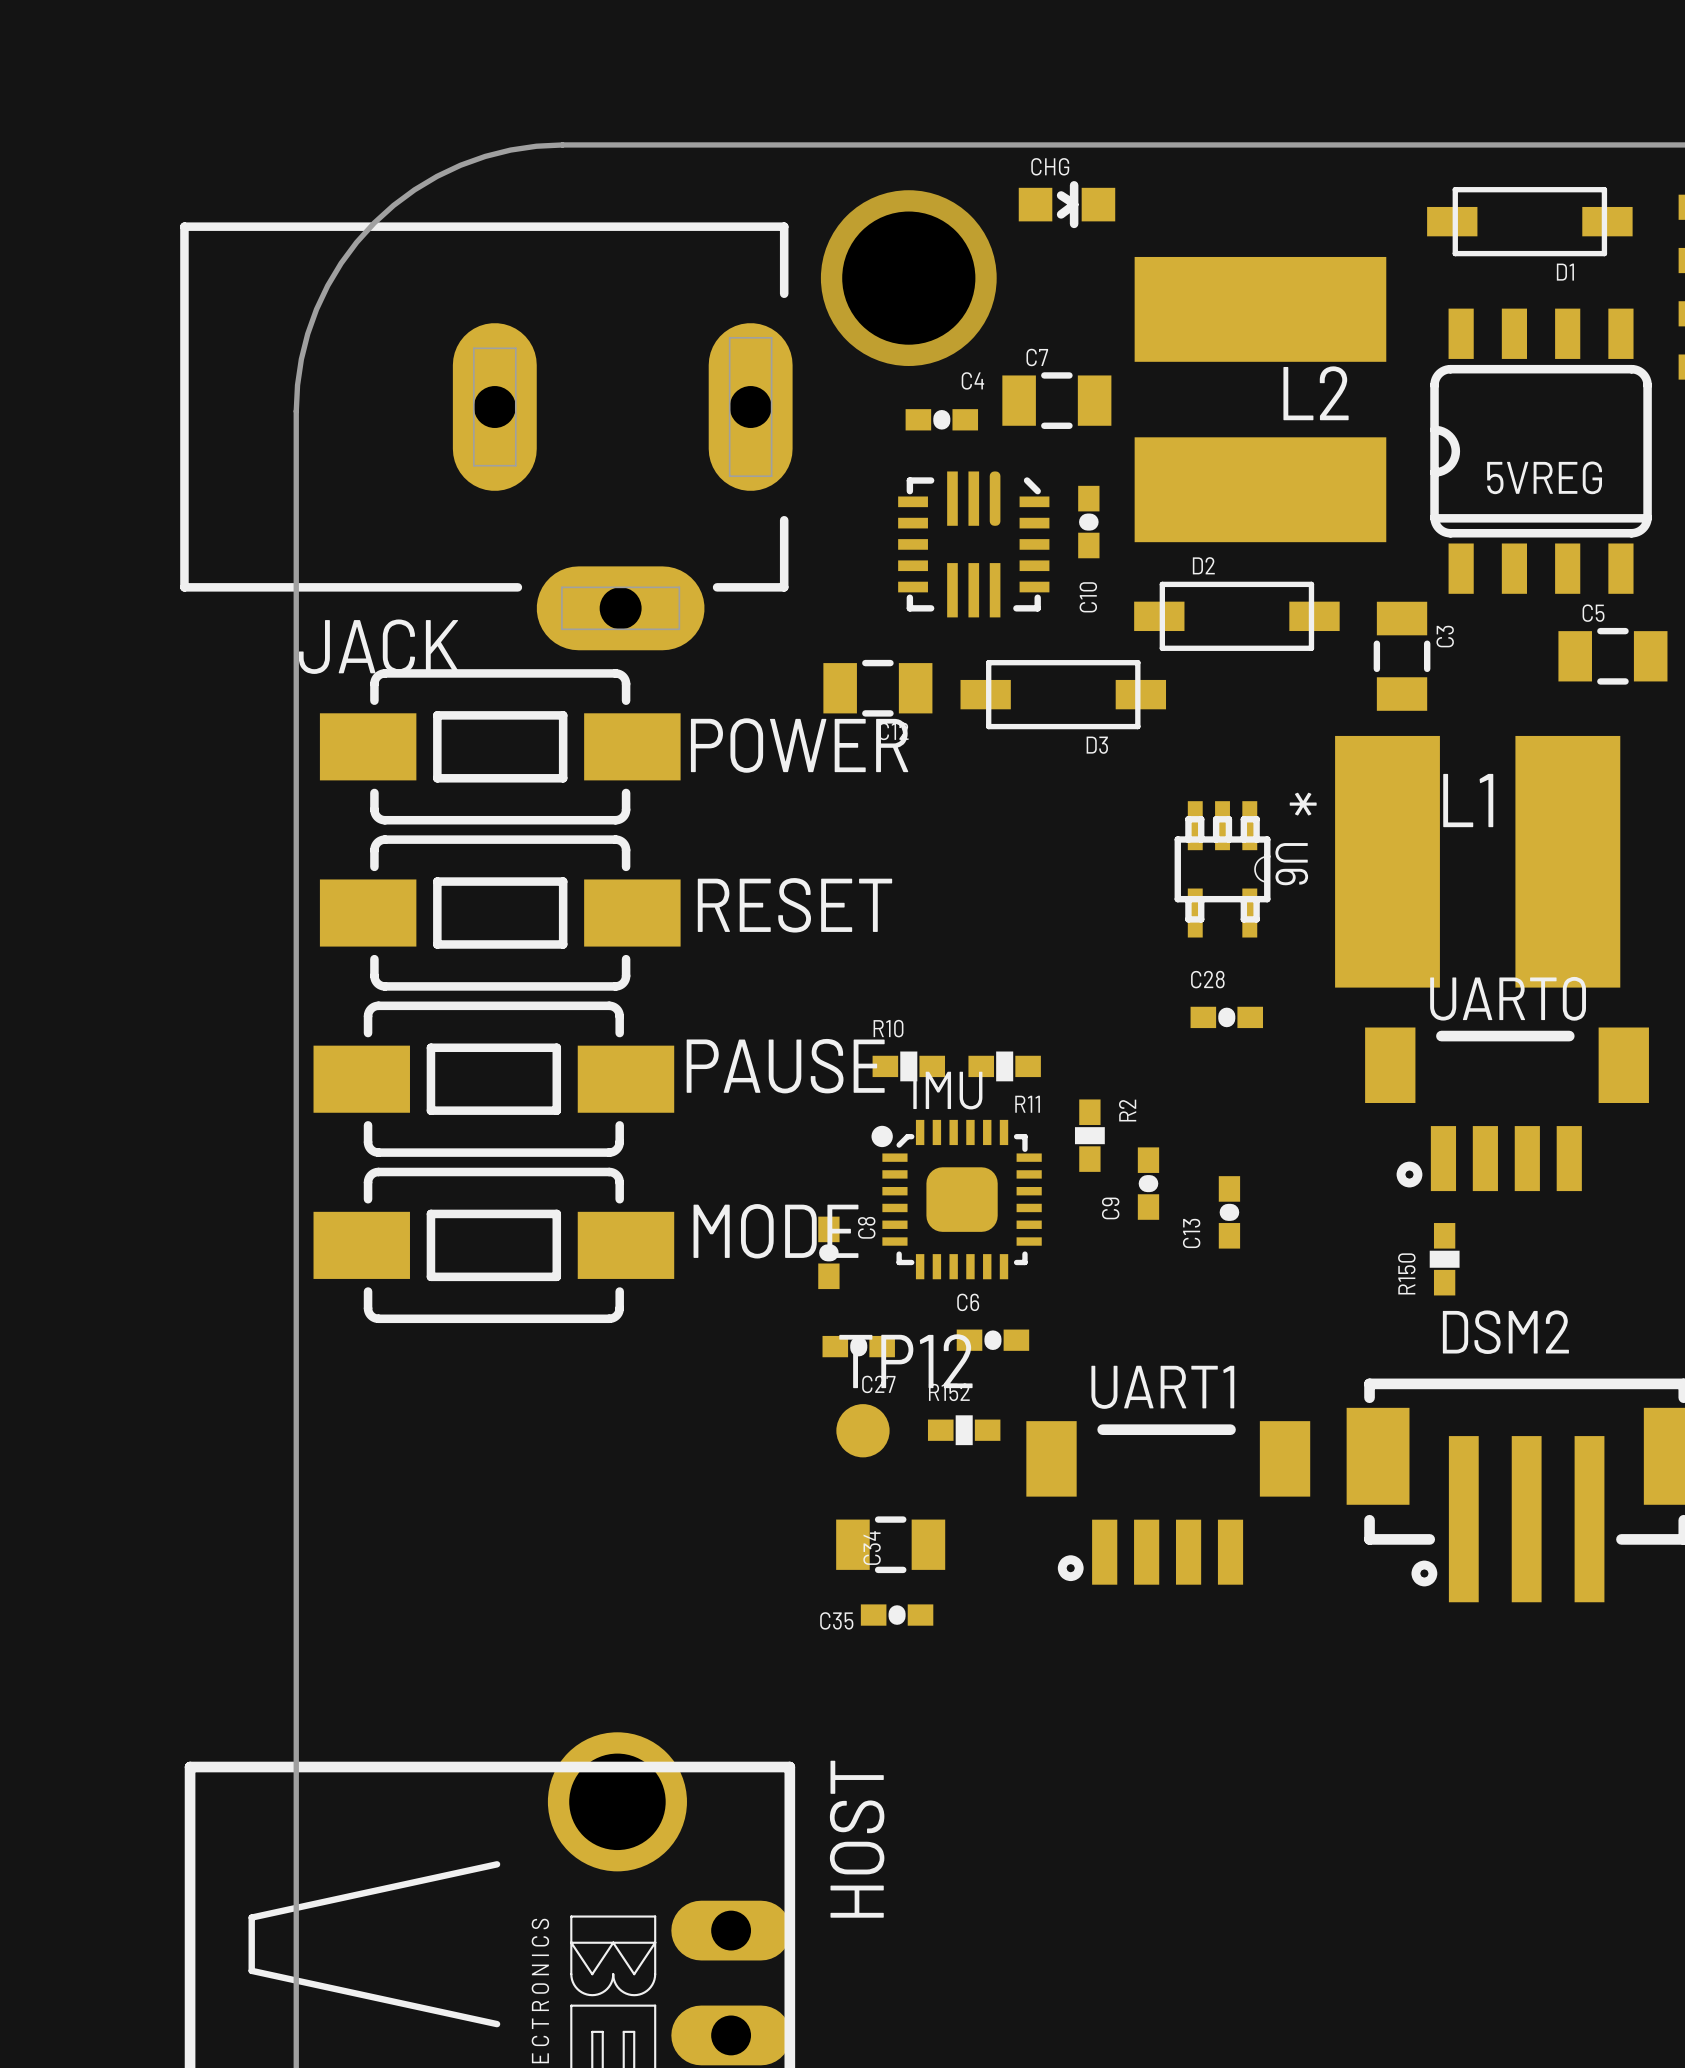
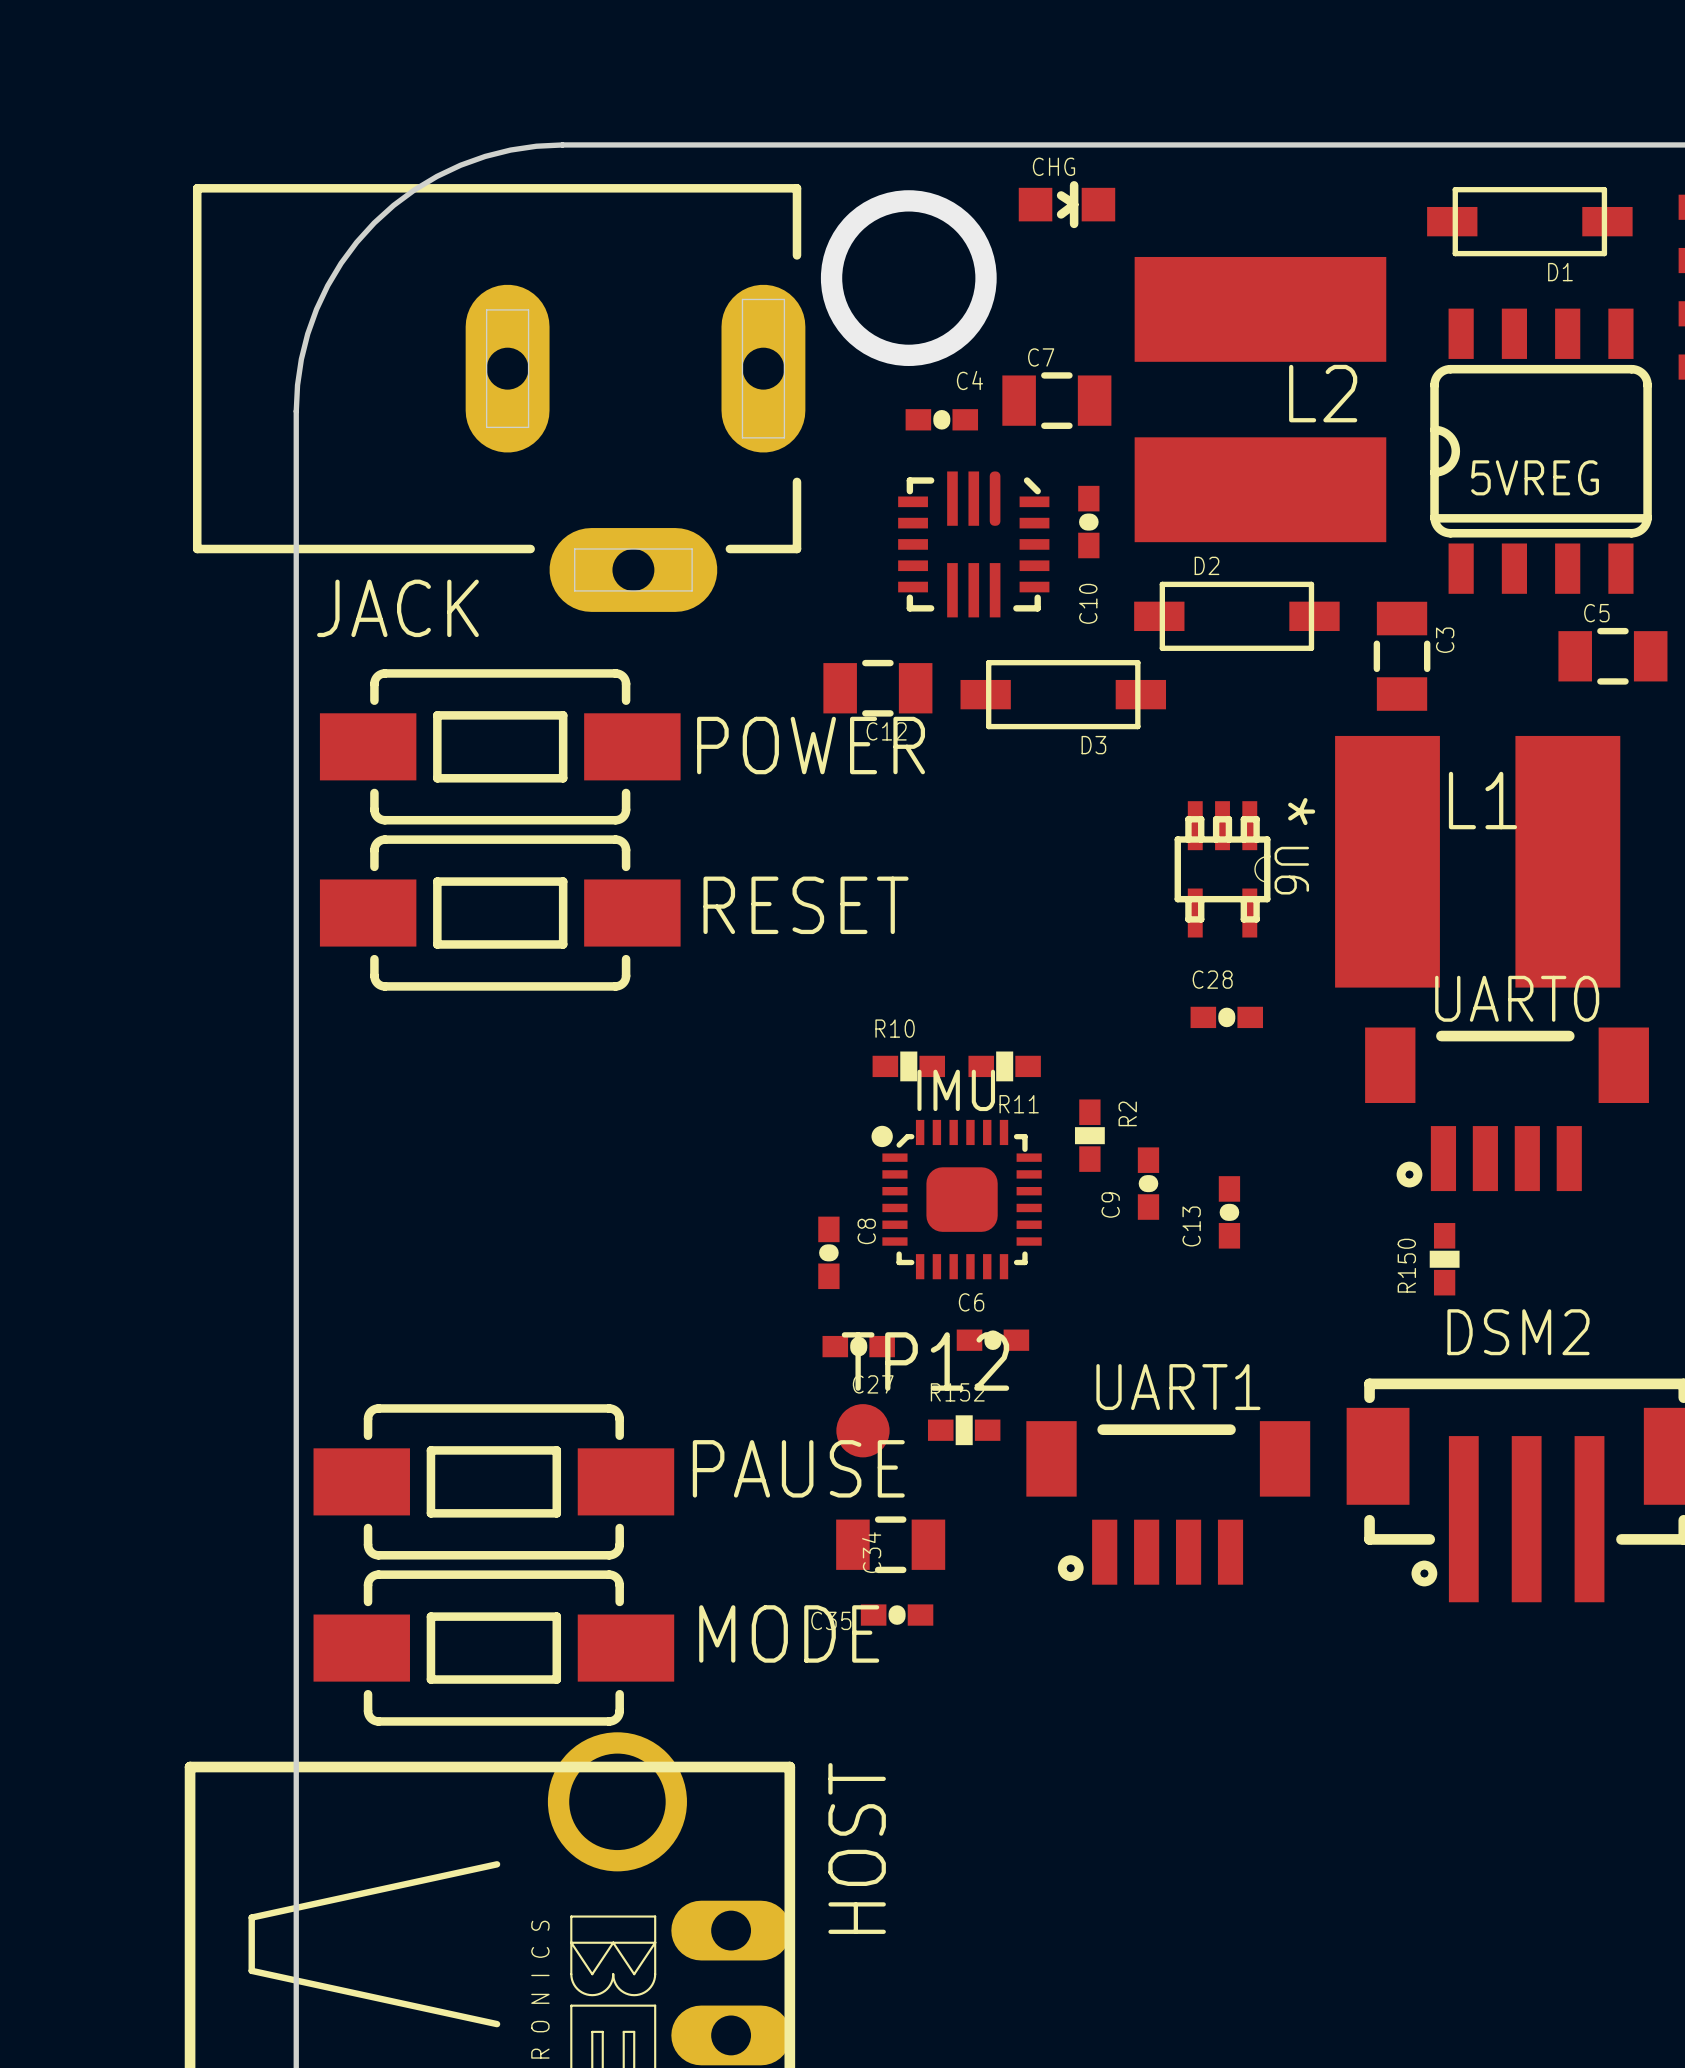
JACK position: (486, 436) -> (499, 397)
PAUSE position: (493, 1079) -> (493, 1481)
MODE position: (493, 1245) -> (493, 1648)

